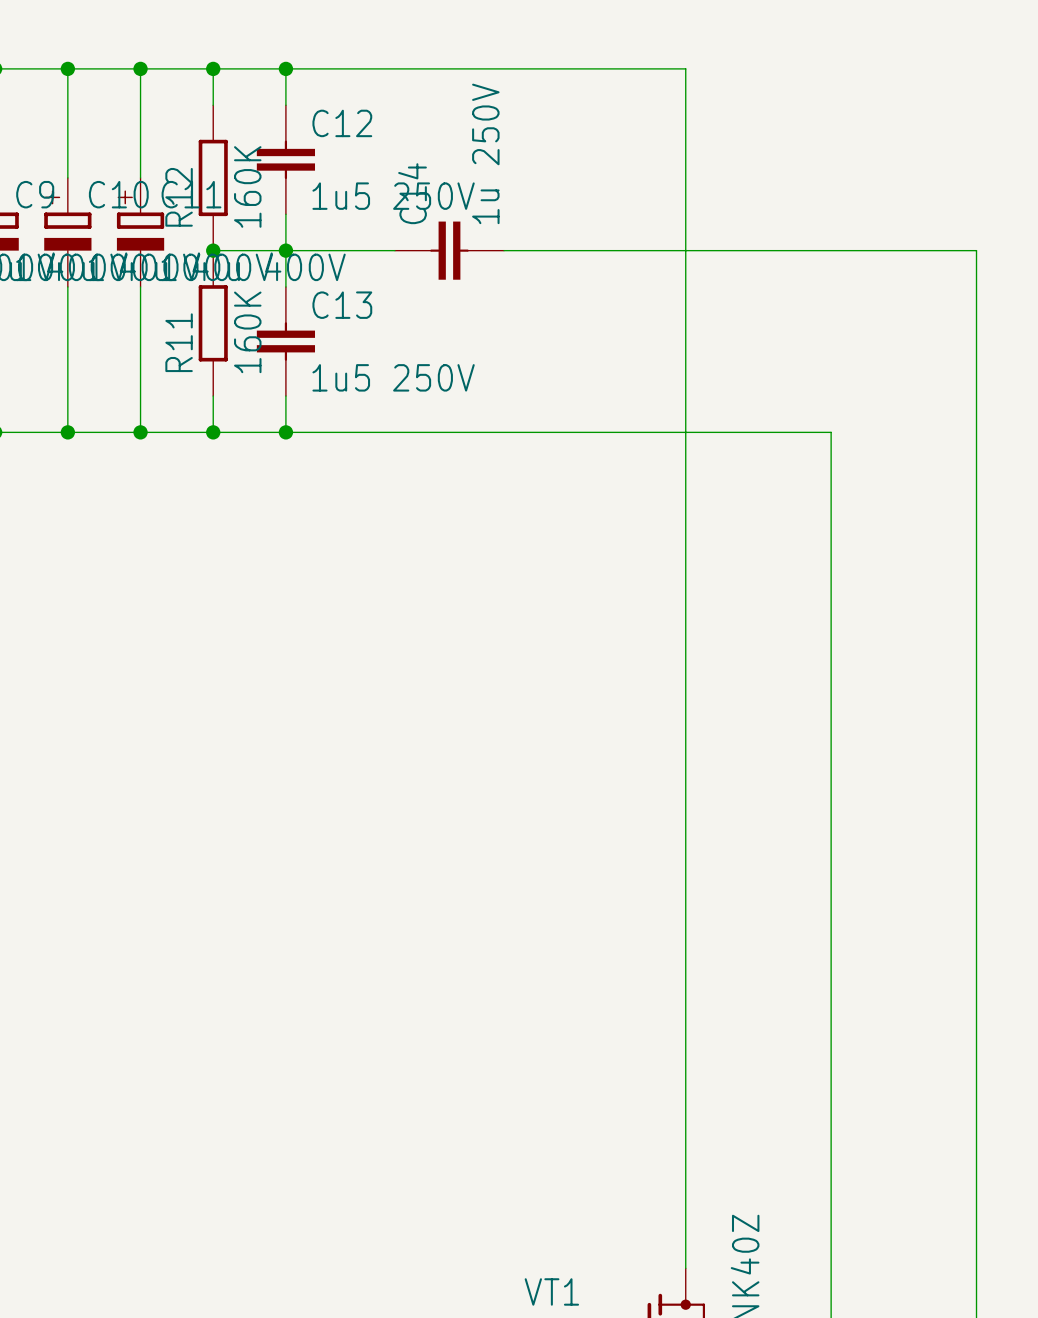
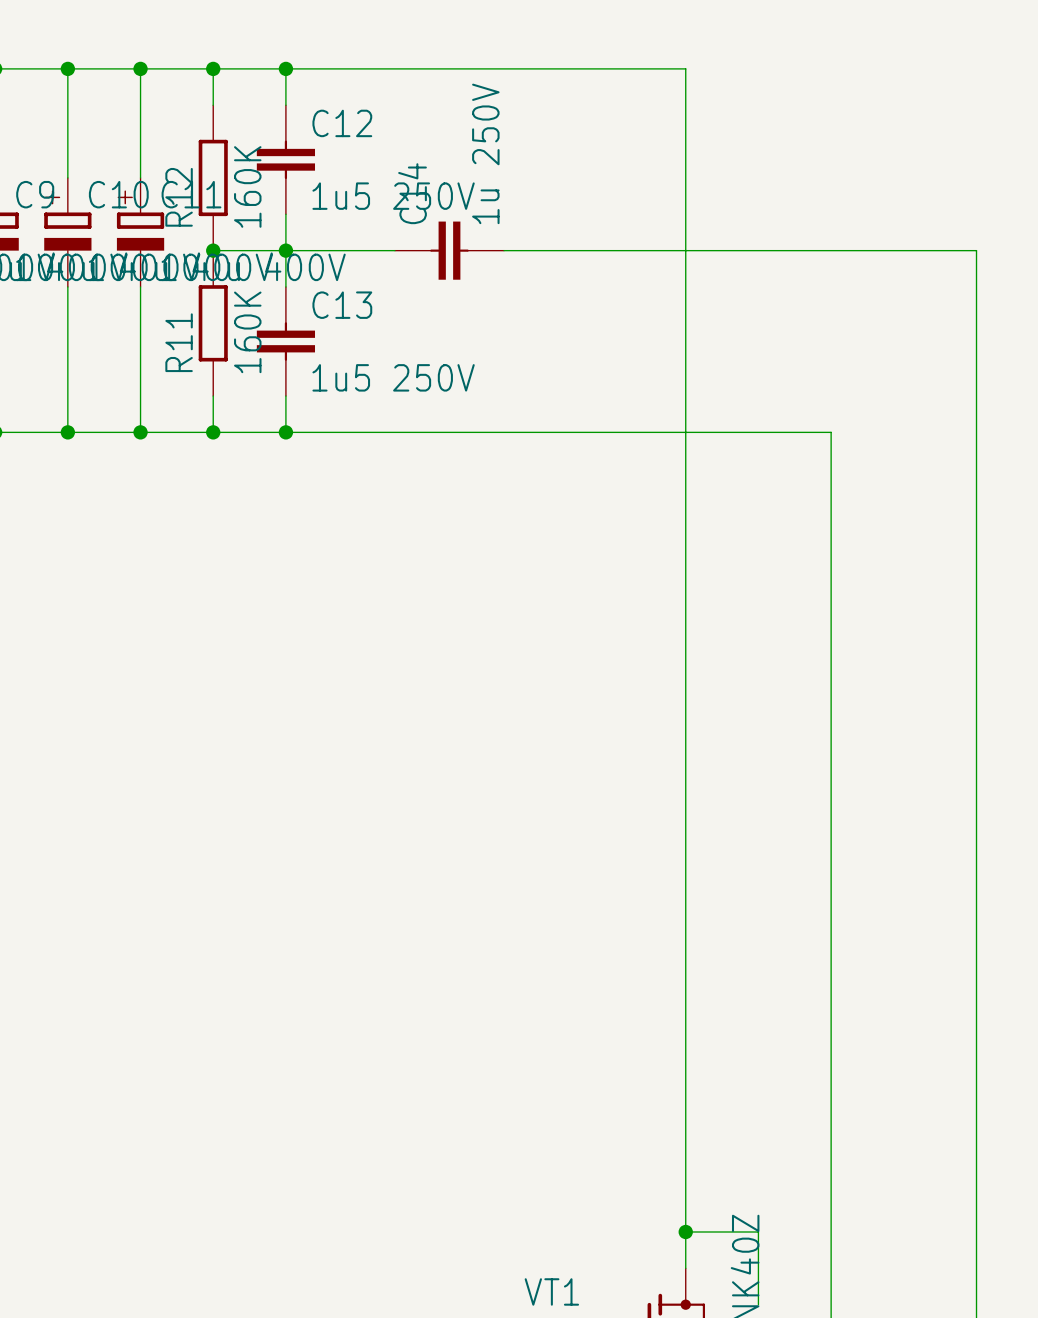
wire: none -> (685, 1231) (758, 1231) (758, 1304)
junction: none -> (685, 1231)

